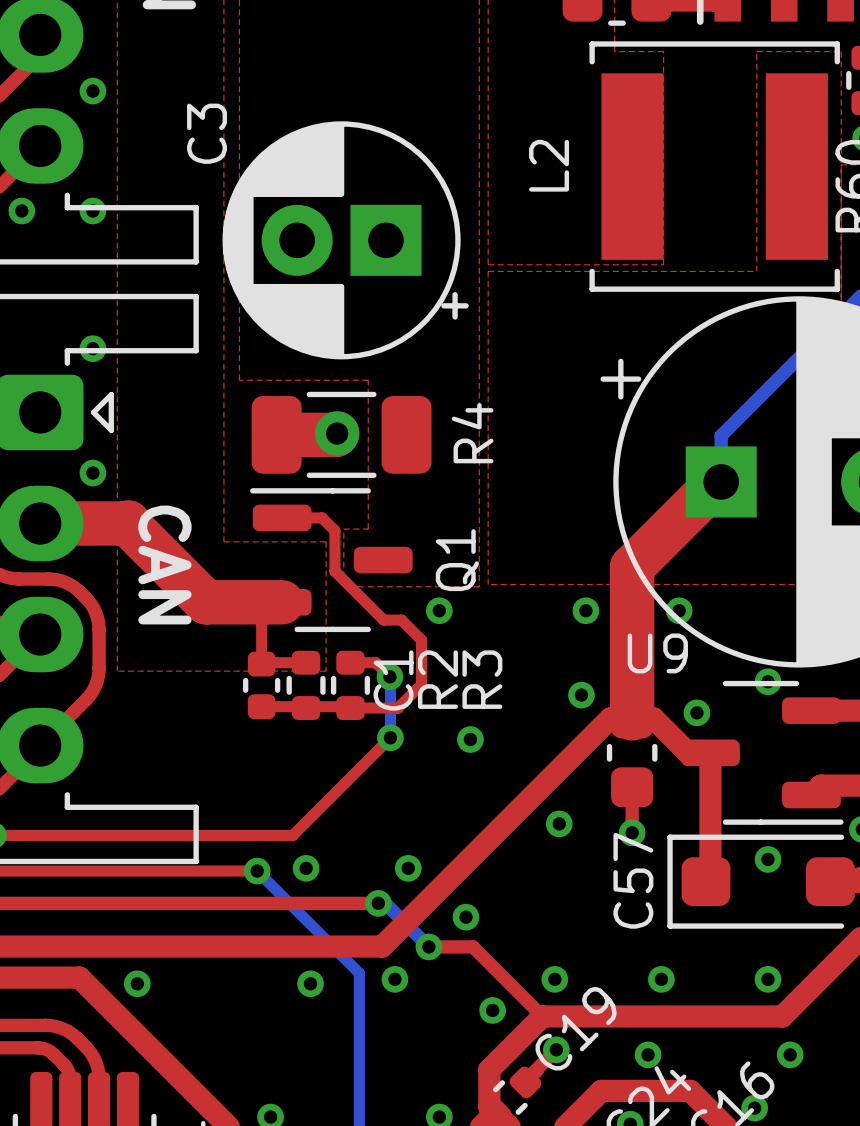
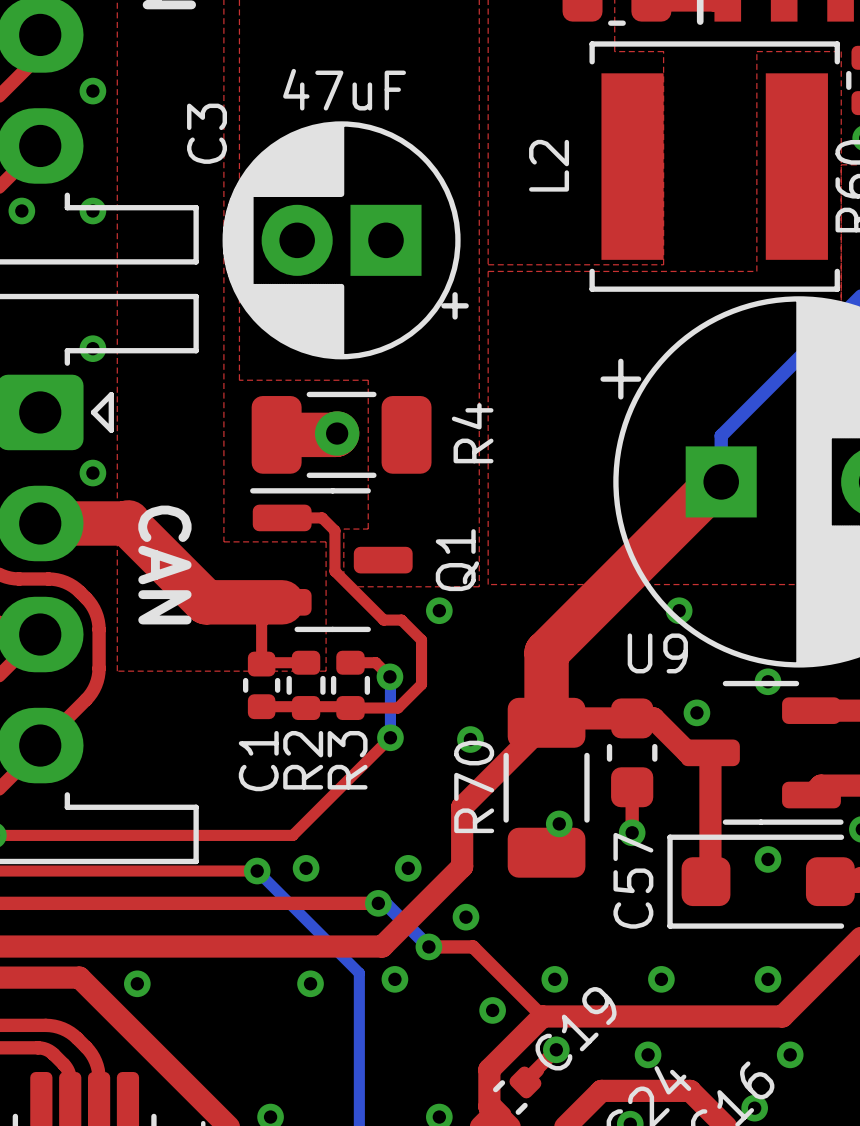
text: none -> 47uF (344, 89)
top track: (632, 567) (632, 718) -> (632, 567) (546, 652) (546, 722)
via: (585, 610) -> none
R2 name position: R2 (437, 679) -> R2 (303, 760)
R3 name position: R3 (482, 679) -> R3 (347, 760)
C1 name position: C1 (393, 680) -> C1 (258, 761)
via: (581, 695) -> none
top track: (610, 718) (462, 866) -> (610, 718) (550, 718) (462, 807) (462, 866)
R70: none -> (546, 787)

